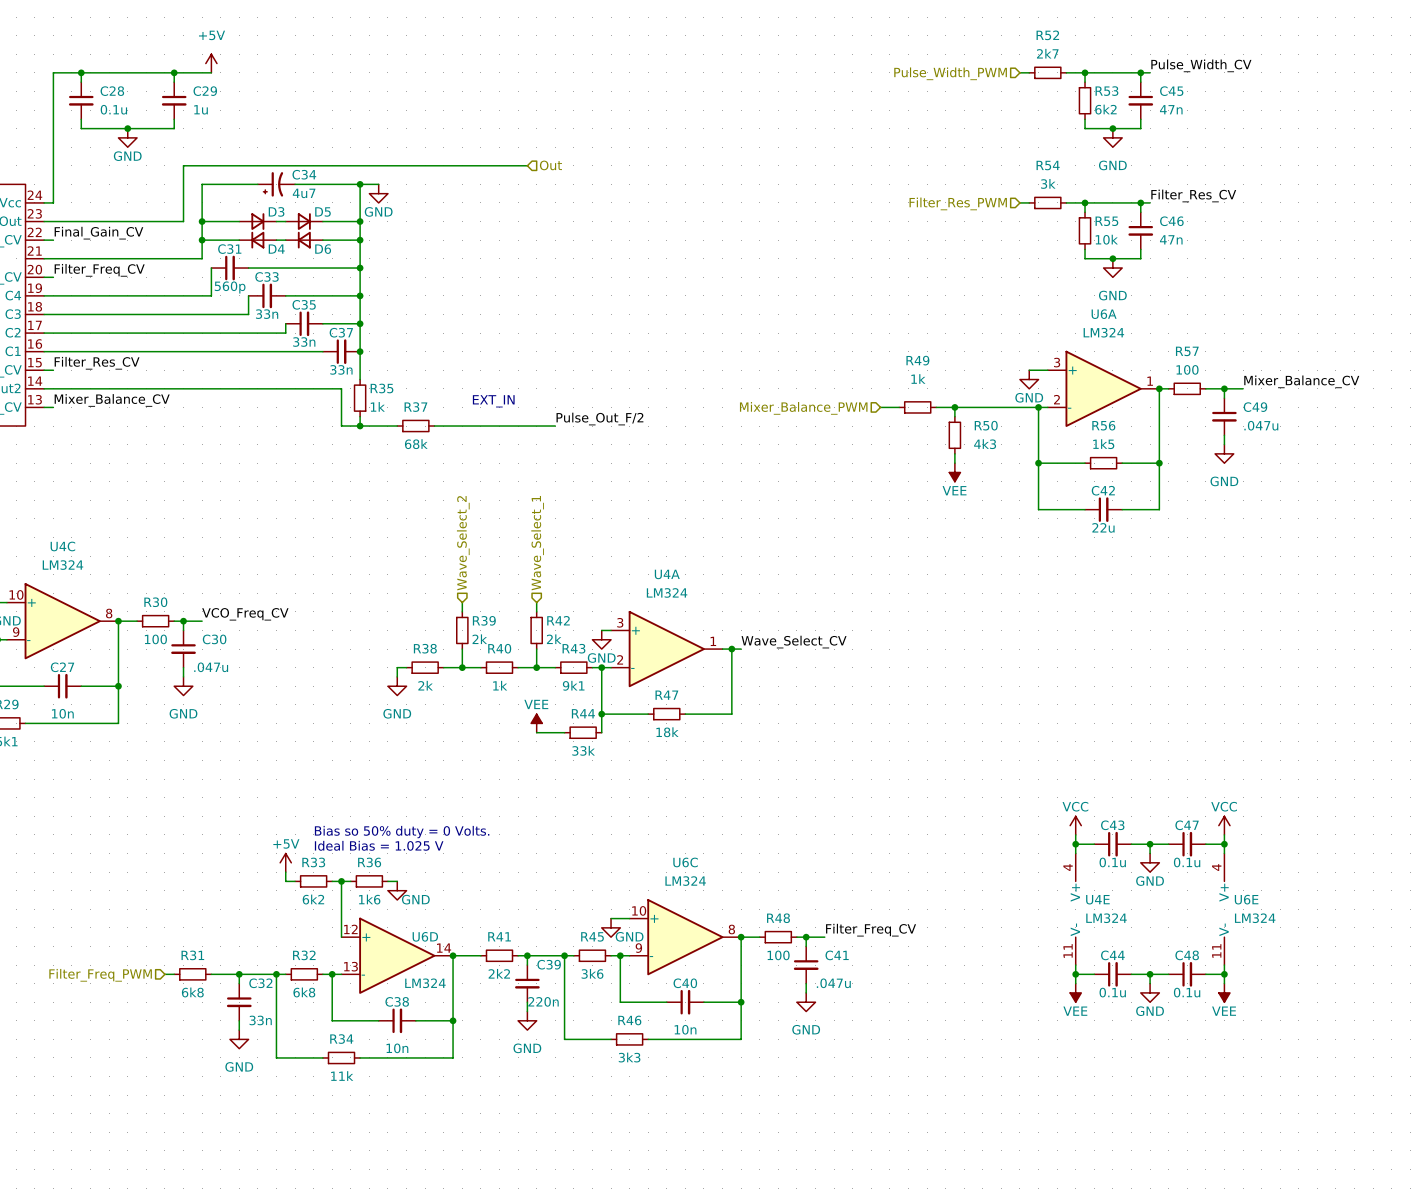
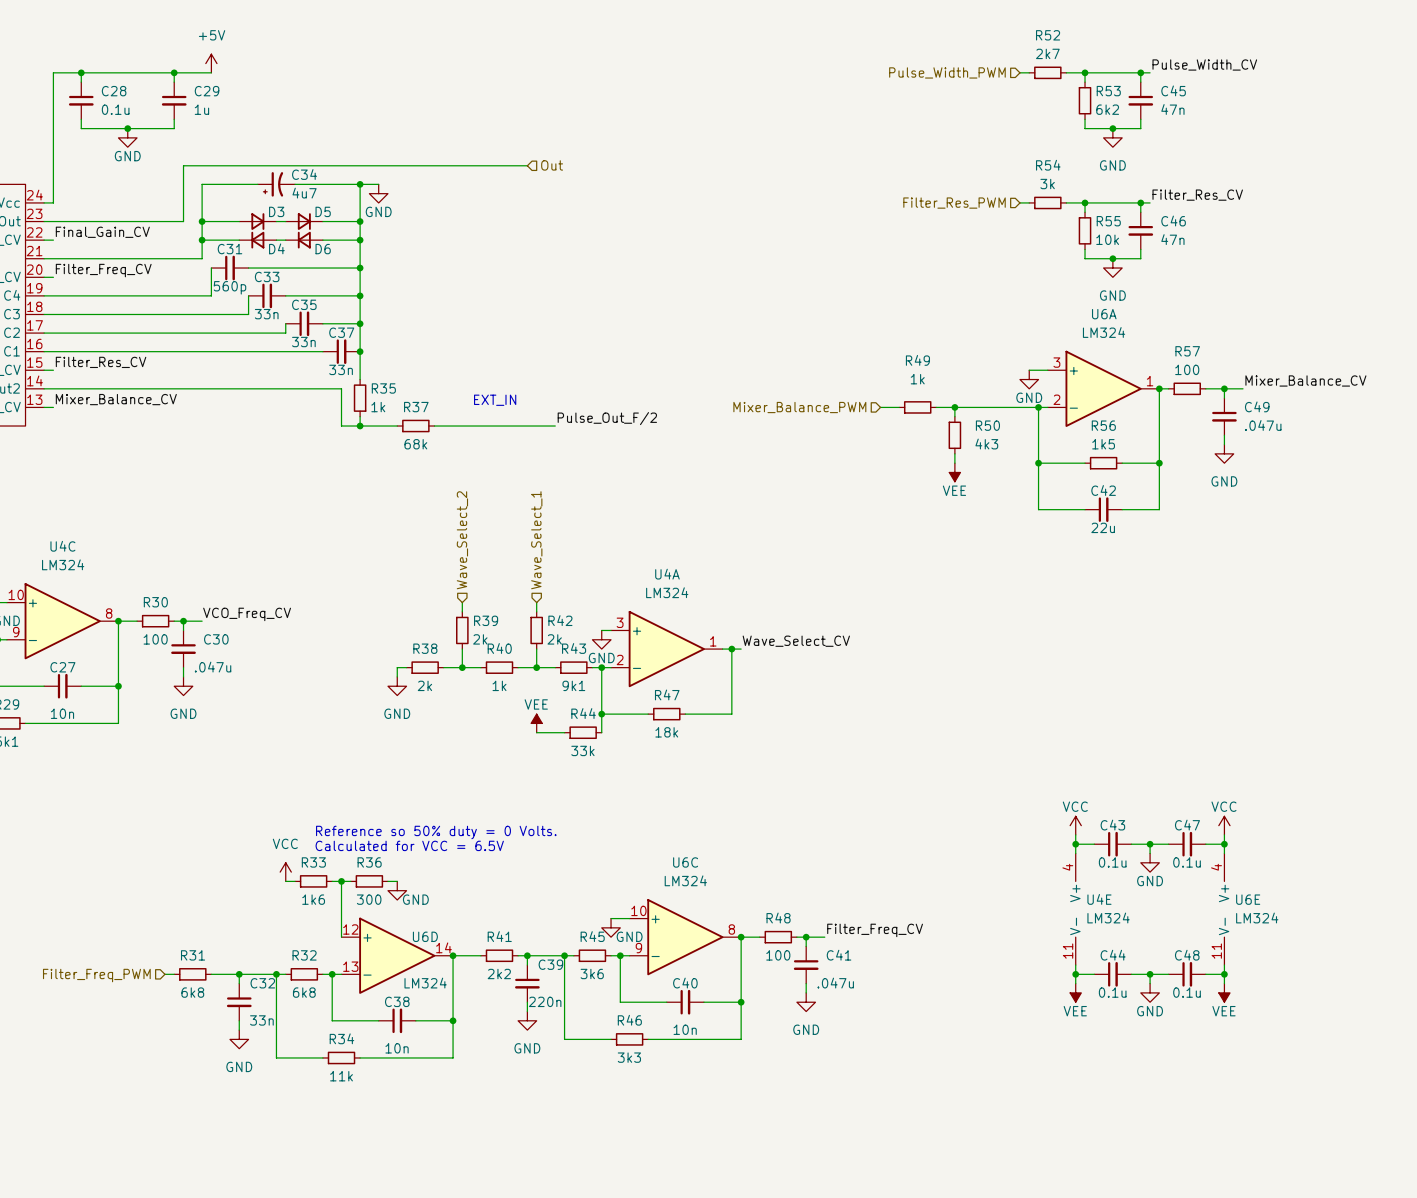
text: Bias so 50% duty = 0 Volts. (402, 832) -> Reference so 50% duty = 0 Volts. (436, 832)
text: Ideal Bias = 1.025 V (379, 845) -> Calculated for VCC = 6.5V (409, 845)
power symbol: +5V (285, 862) -> none
power symbol: none -> VCC (285, 872)
R33 value: 6k2 (313, 899) -> 1k6 (313, 899)
R36 value: 1k6 (369, 899) -> 300 (369, 899)

